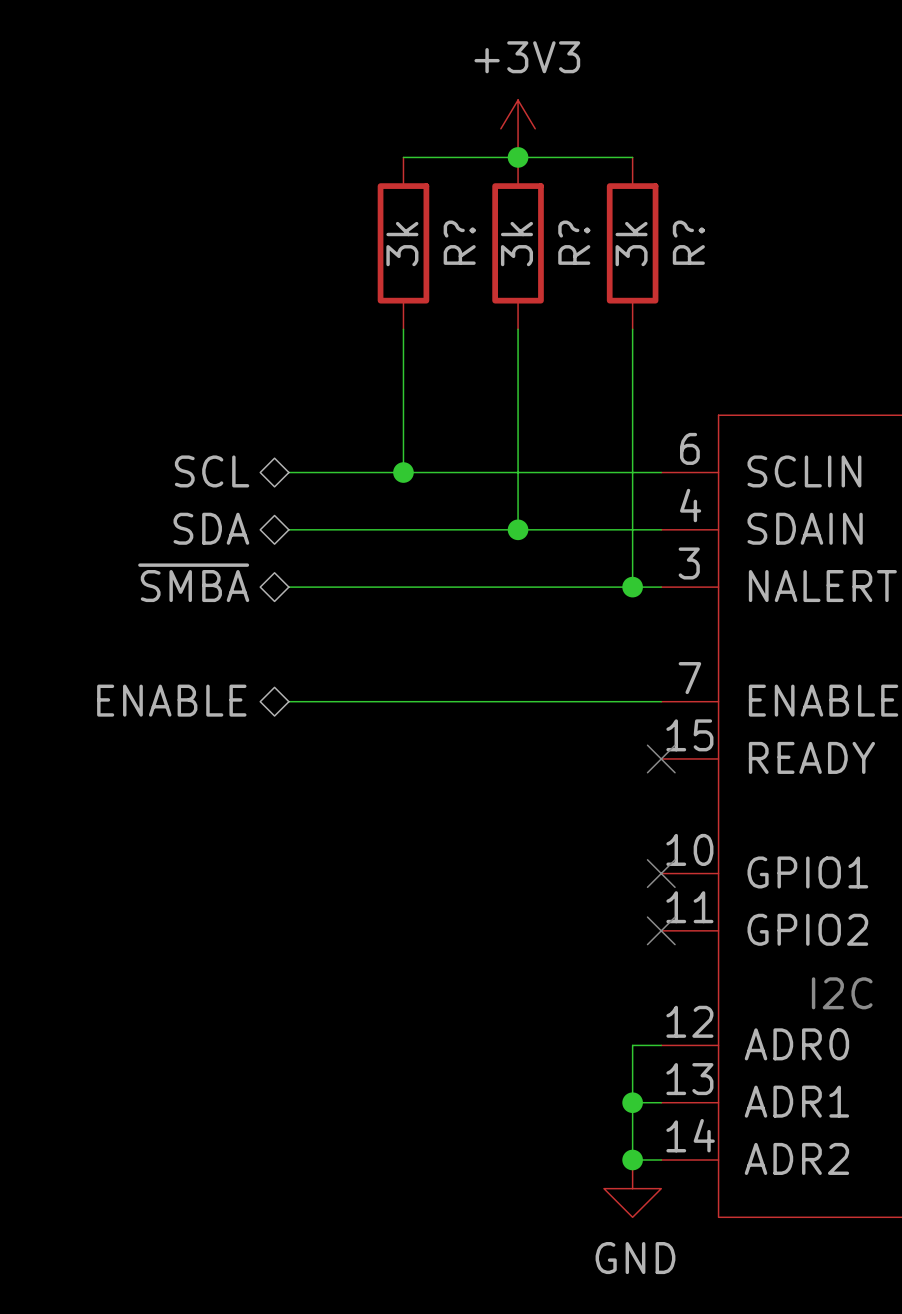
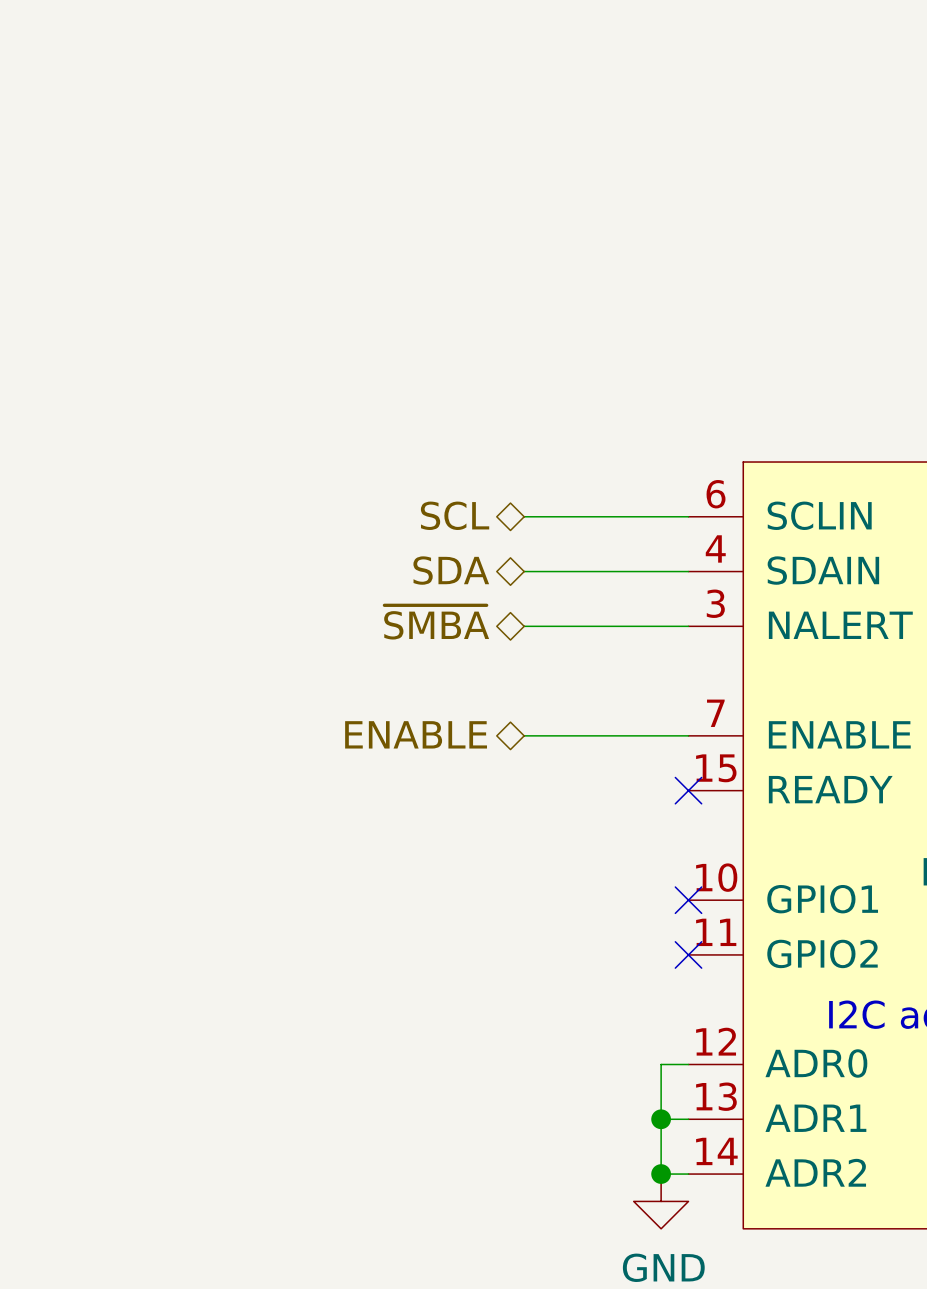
power symbol: +3V3 (518, 128) -> none
wire: (403, 157) (632, 157) -> none
junction: (518, 157) -> none
R?: 3k (403, 243) -> none
R?: 3k (518, 243) -> none
R?: 3k (632, 243) -> none
wire: (403, 329) (403, 472) -> none
wire: (518, 329) (518, 529) -> none
wire: (632, 329) (632, 587) -> none
hierarchical label position: SCL (212, 471) -> SCL (455, 515)
wire: (288, 472) (489, 472) -> none
junction: (403, 472) -> none
hierarchical label position: SDA (211, 528) -> SDA (451, 570)
wire: (288, 529) (489, 529) -> none
junction: (518, 529) -> none
hierarchical label position: ~{SMBA} (193, 582) -> ~{SMBA} (436, 622)
wire: (288, 587) (489, 587) -> none
junction: (632, 587) -> none
hierarchical label position: ENABLE (171, 700) -> ENABLE (416, 734)
wire: (288, 701) (489, 701) -> none

